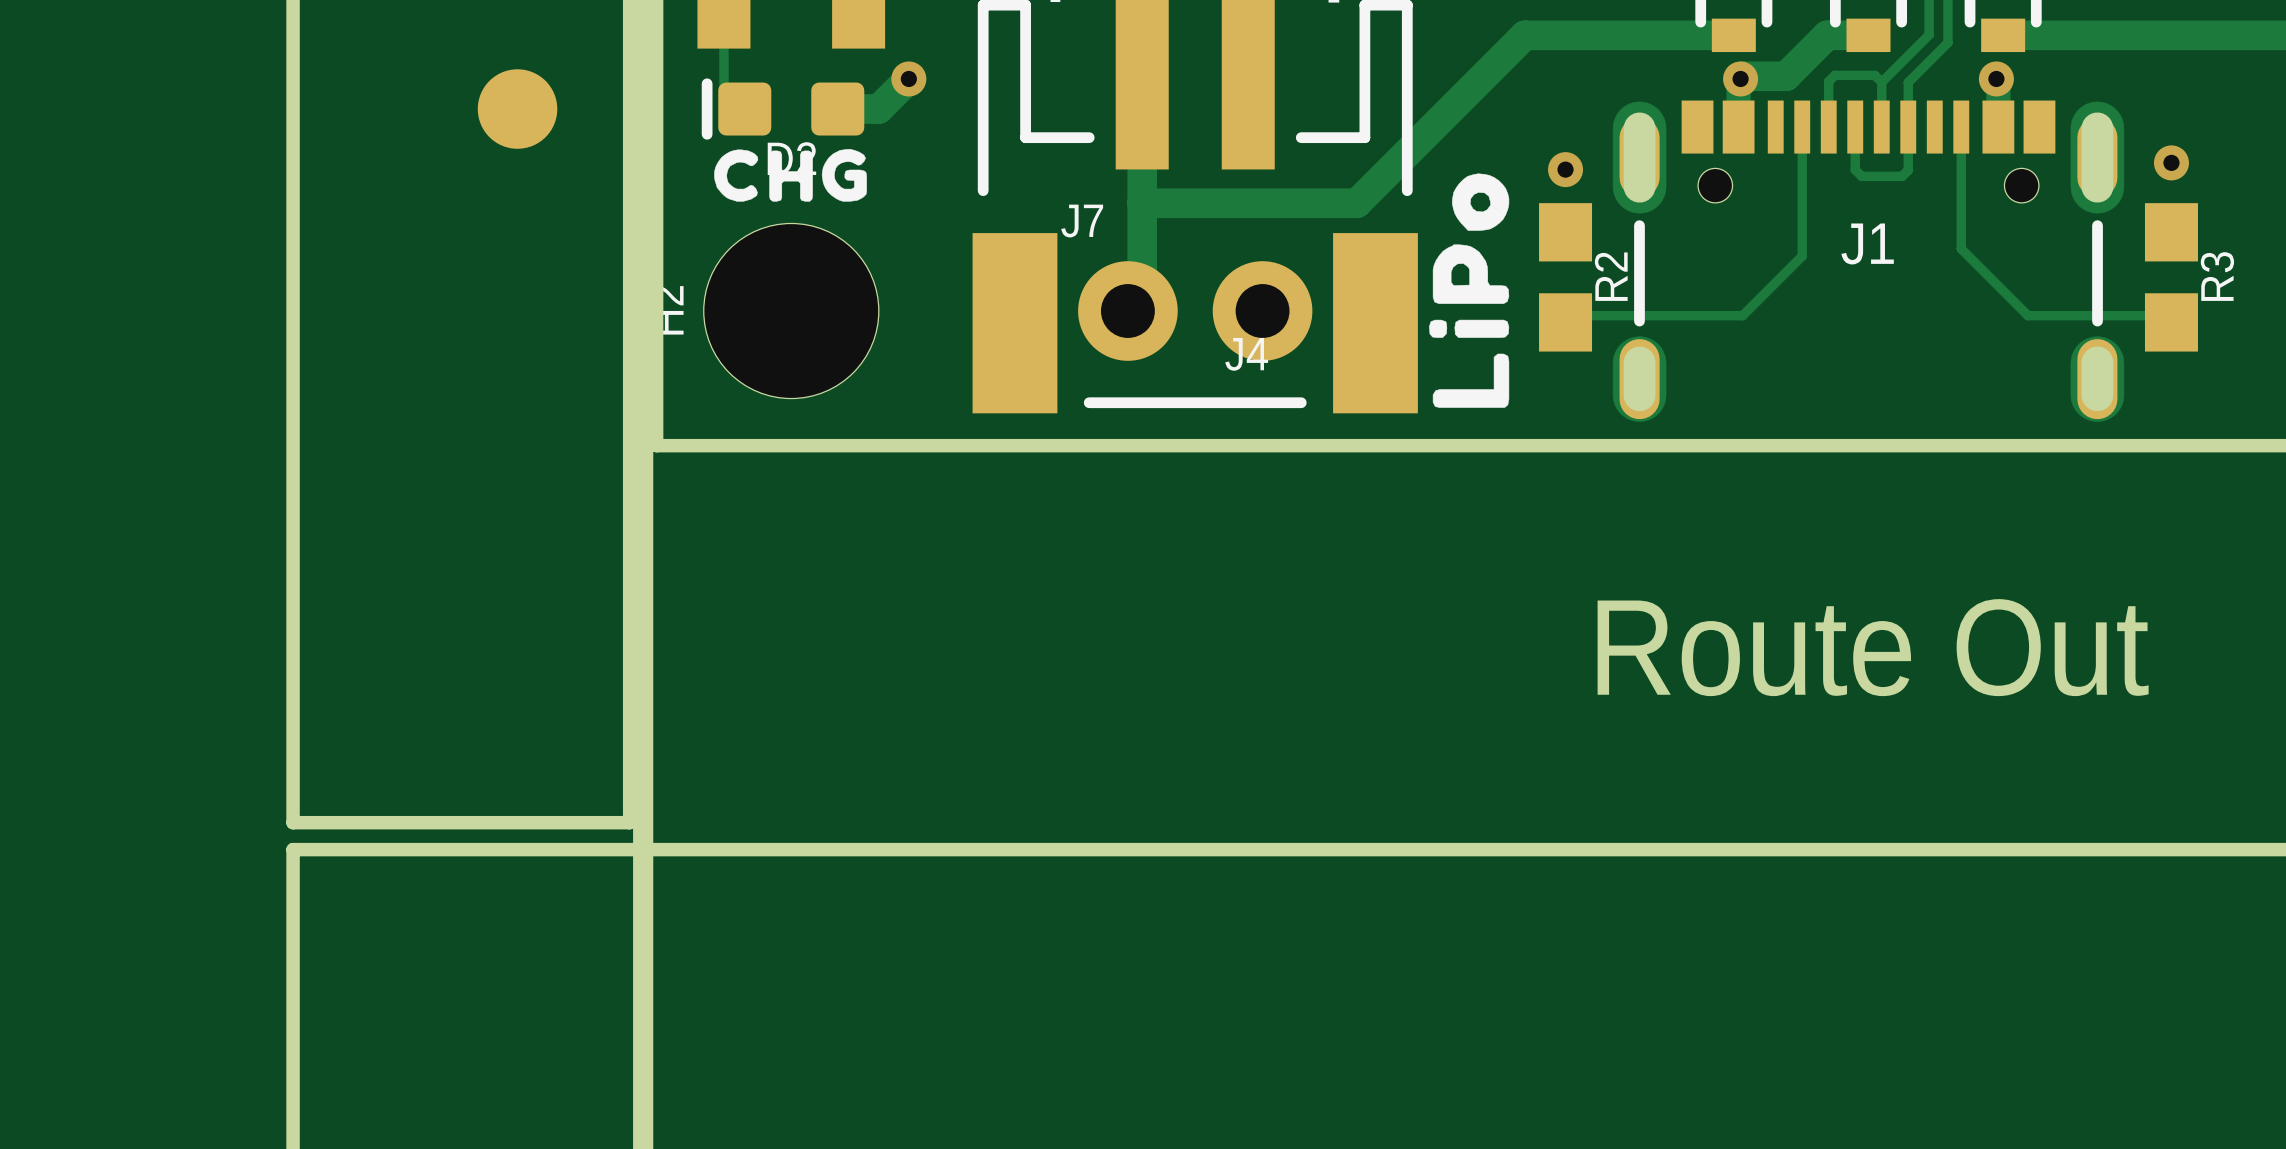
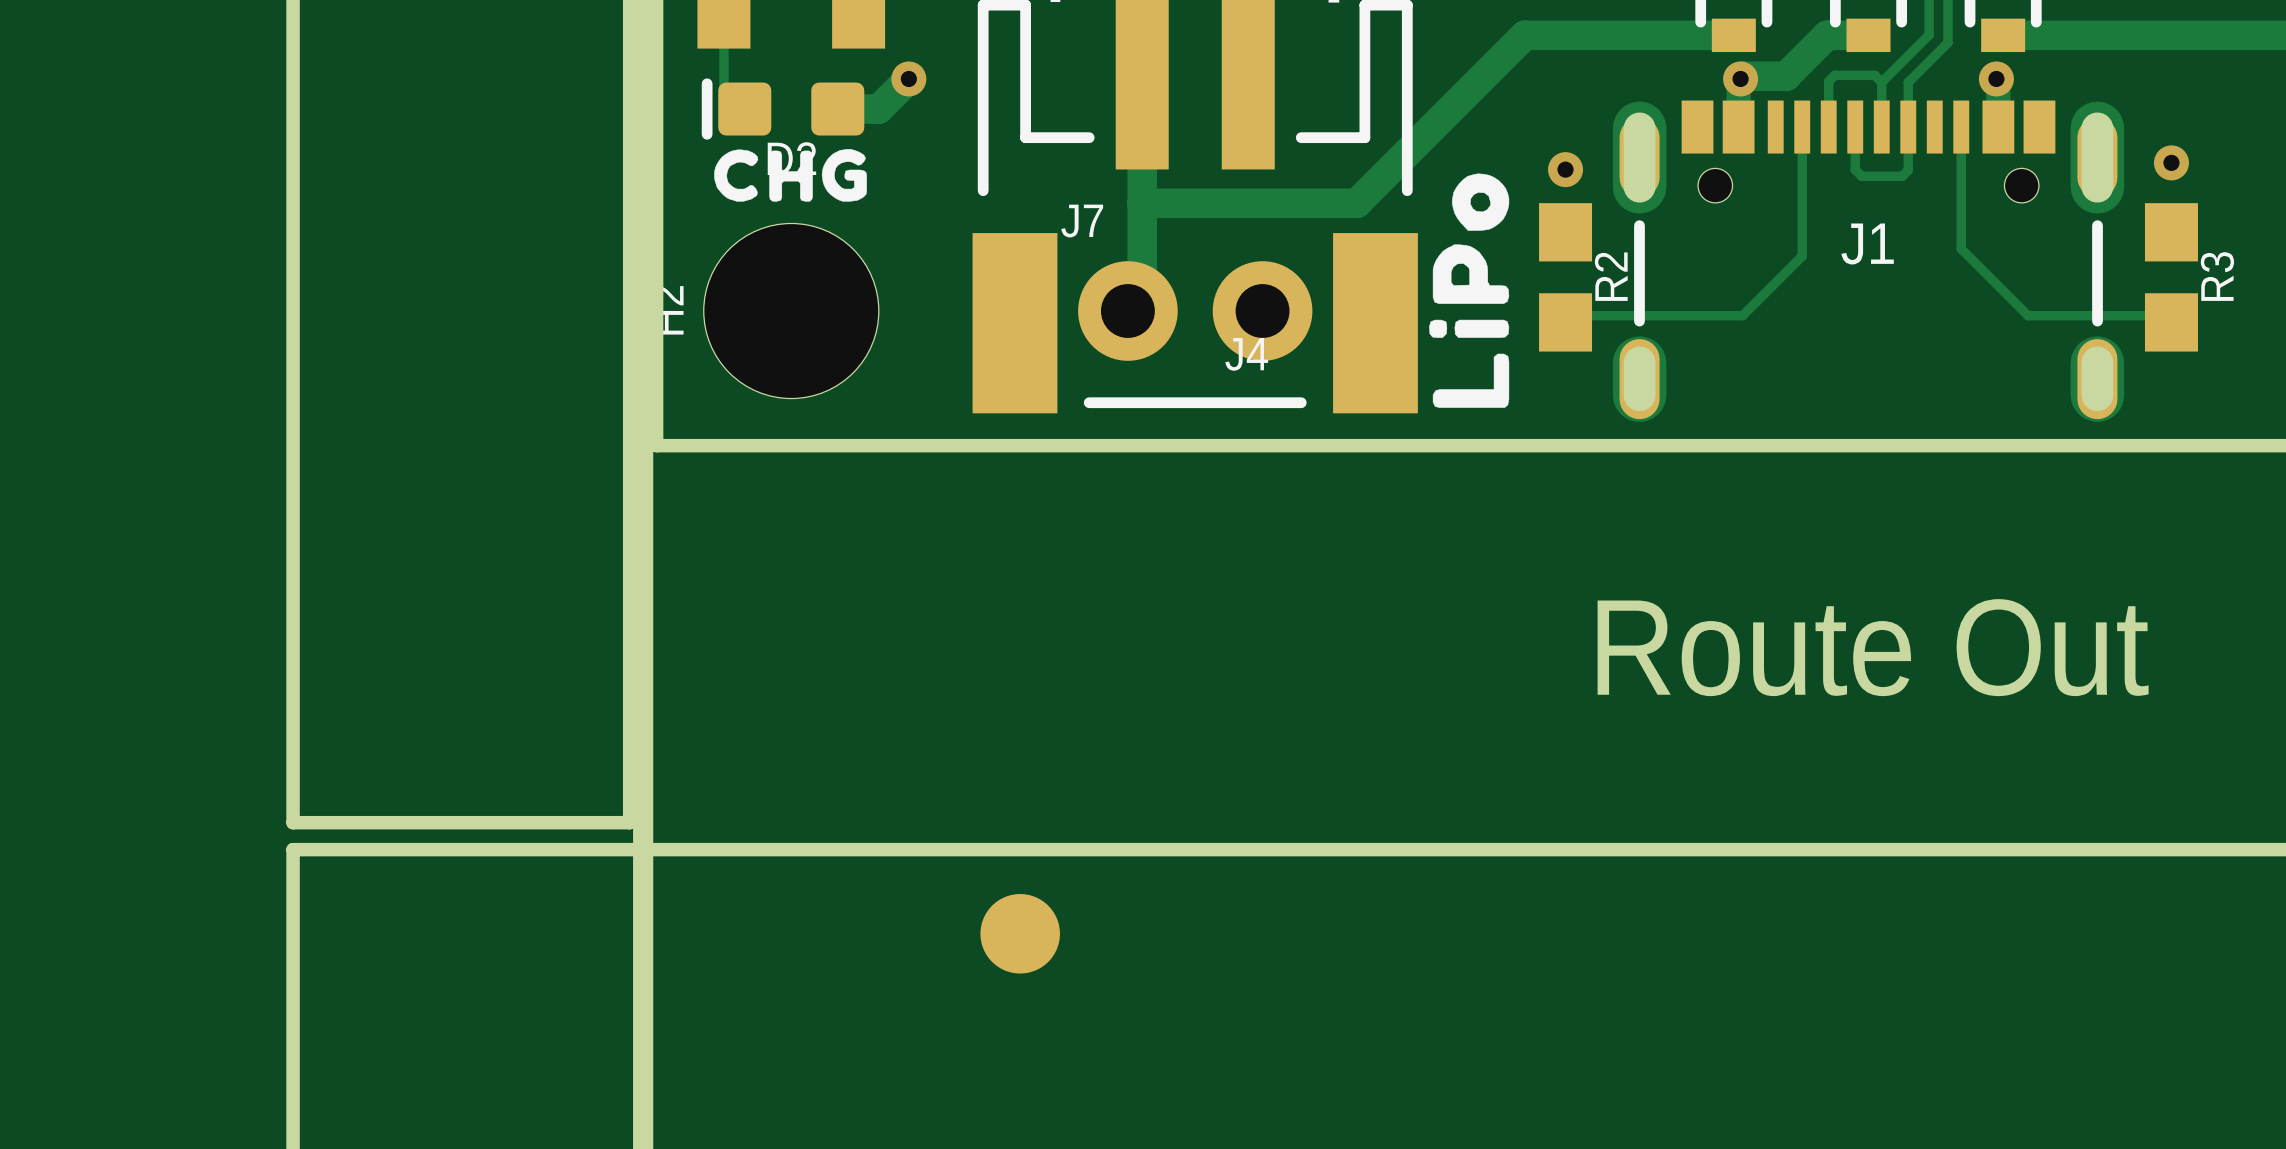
part position: (517, 109) -> (1020, 933)

